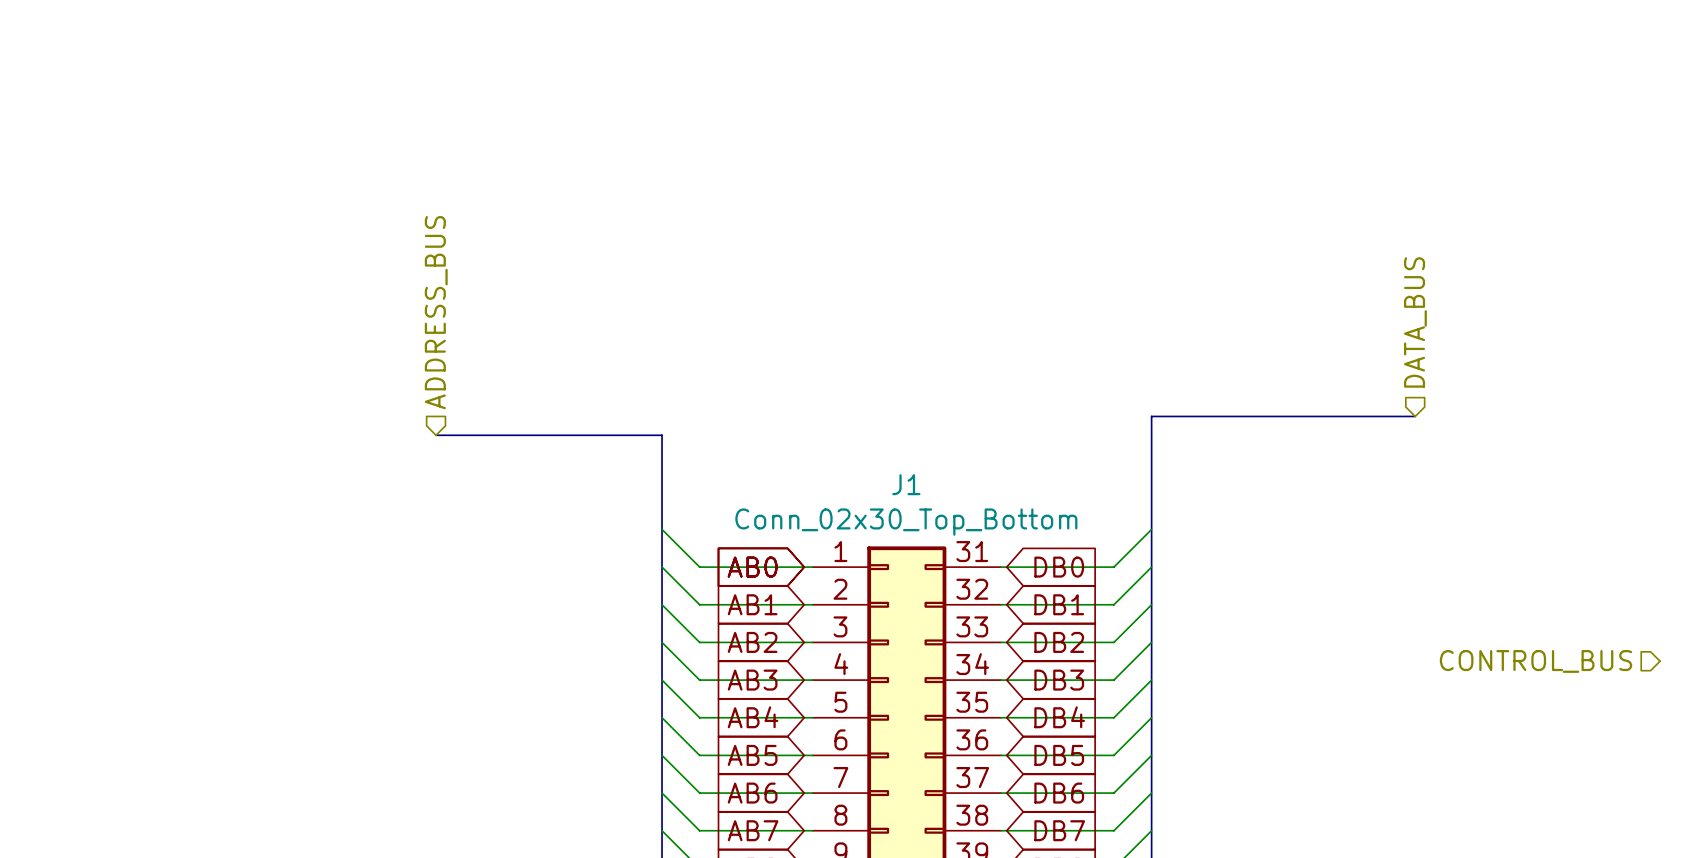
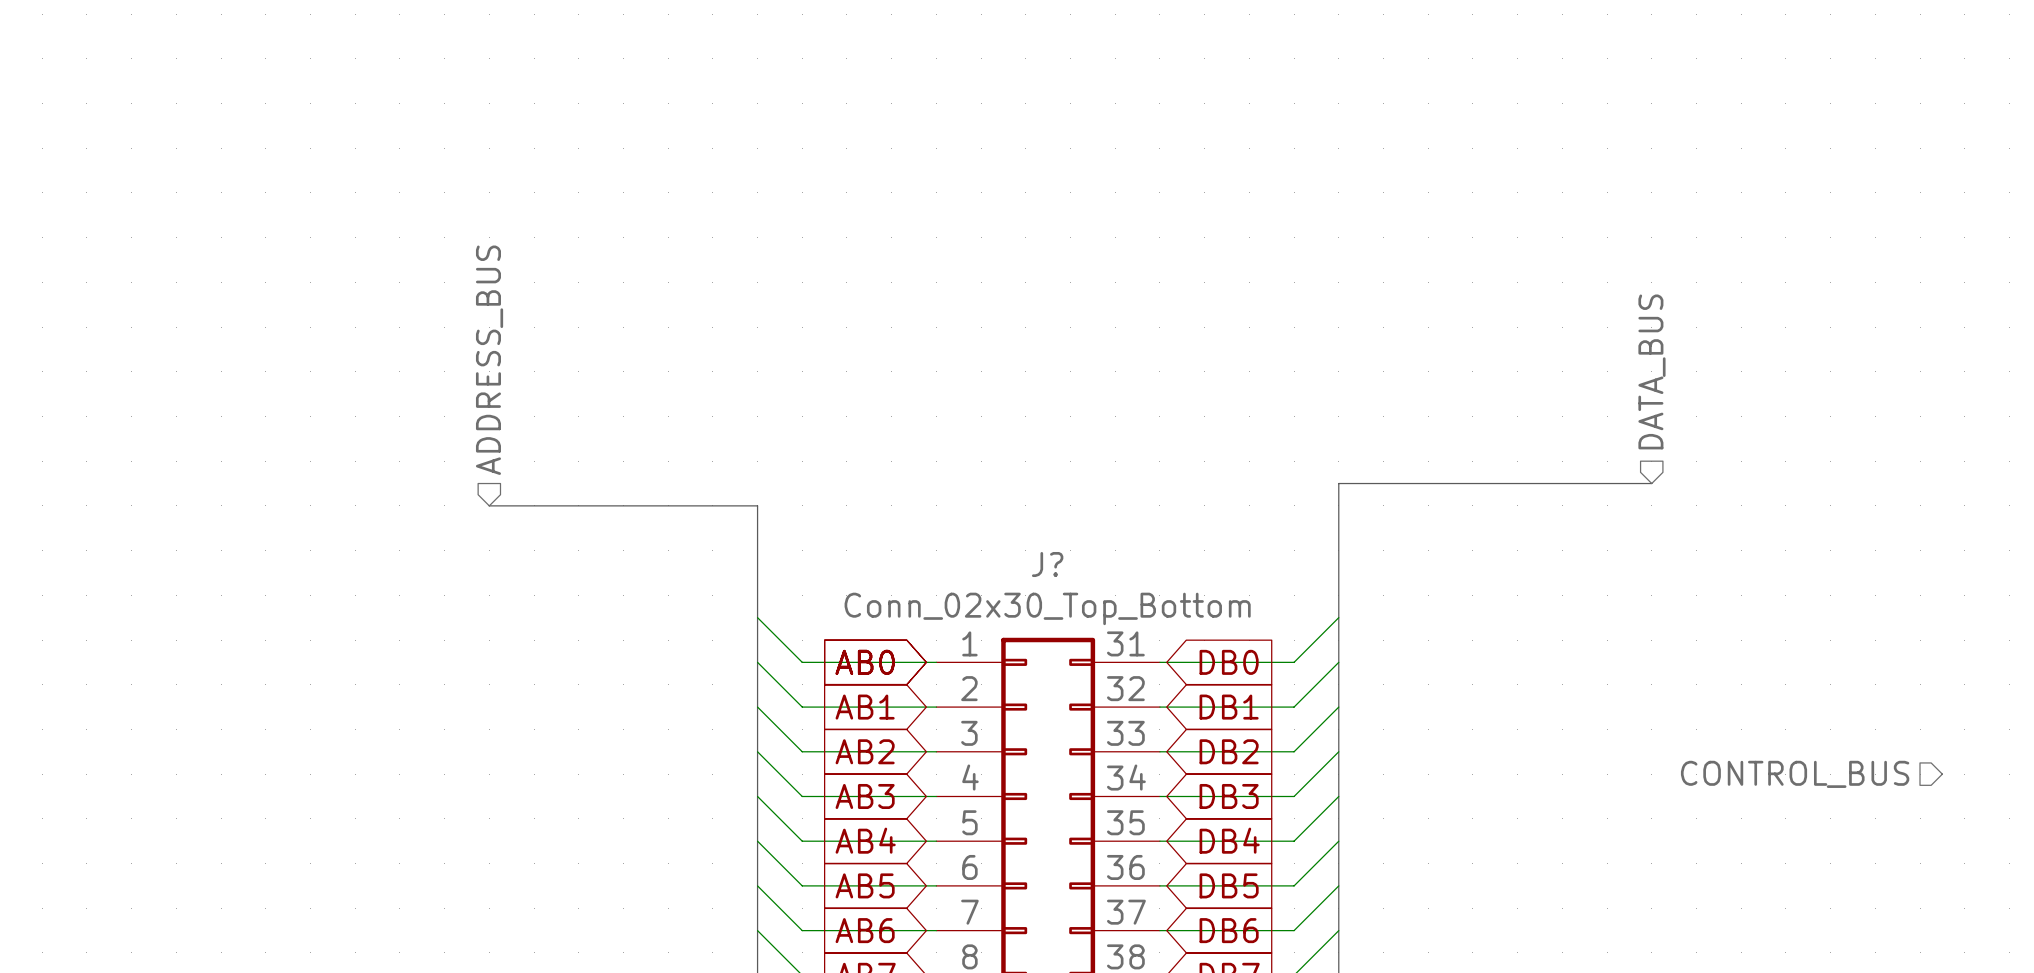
J1 name: J1 (906, 484) -> J? (1047, 564)

